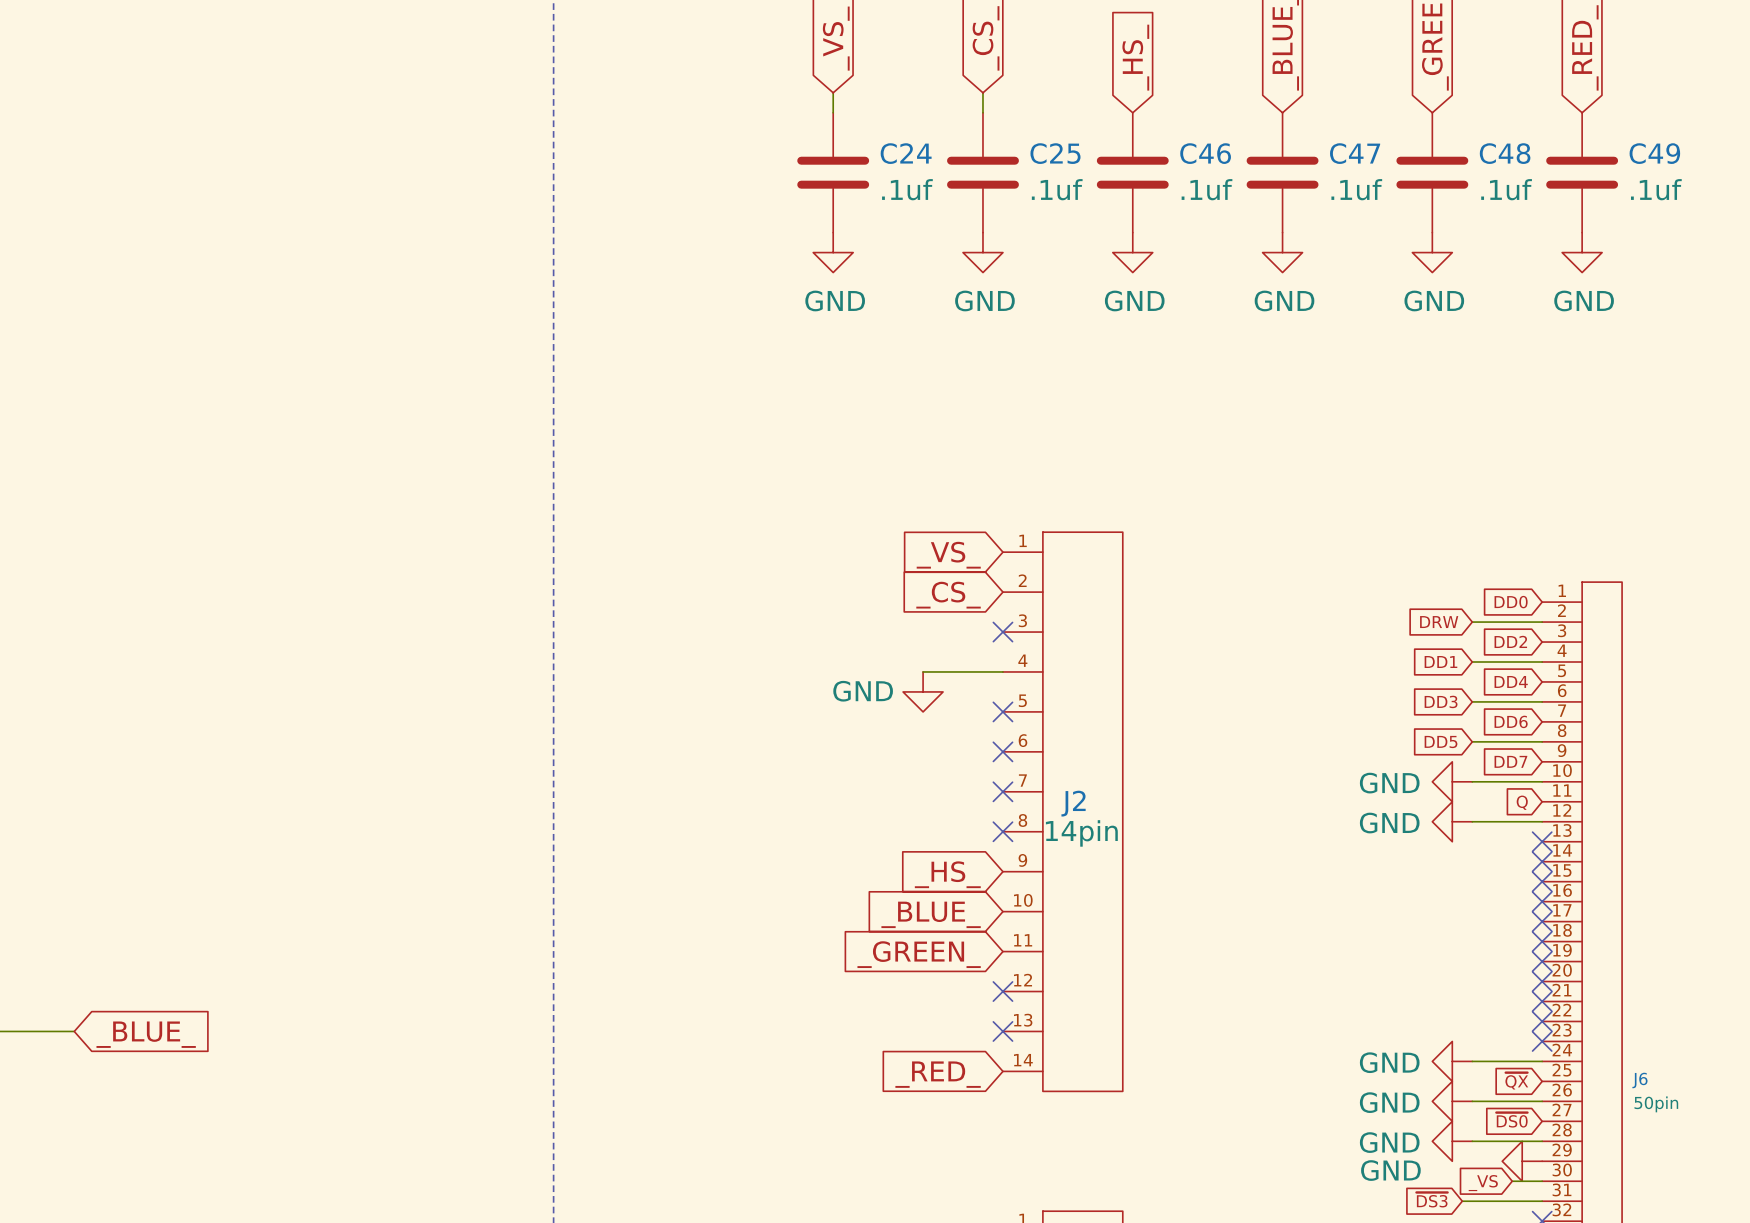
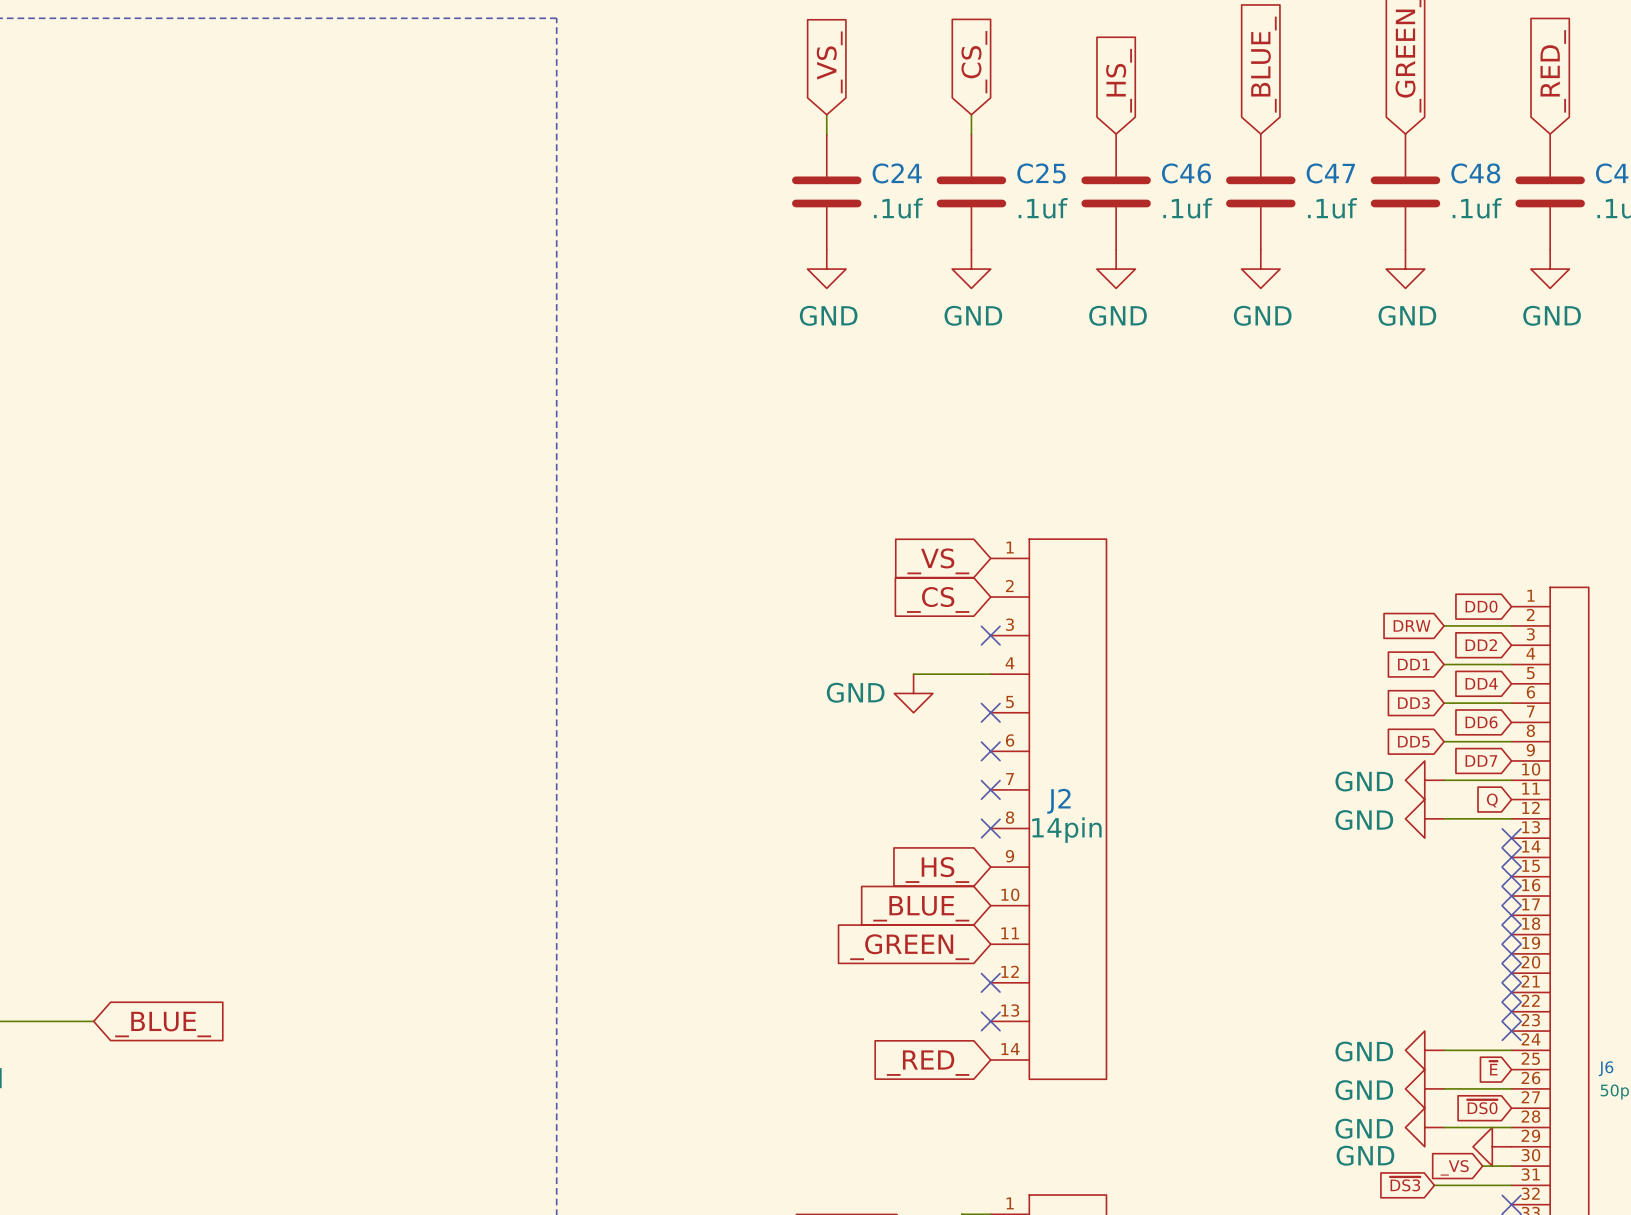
global label: ~{QX} (1516, 1081) -> ~{E} (1493, 1068)

